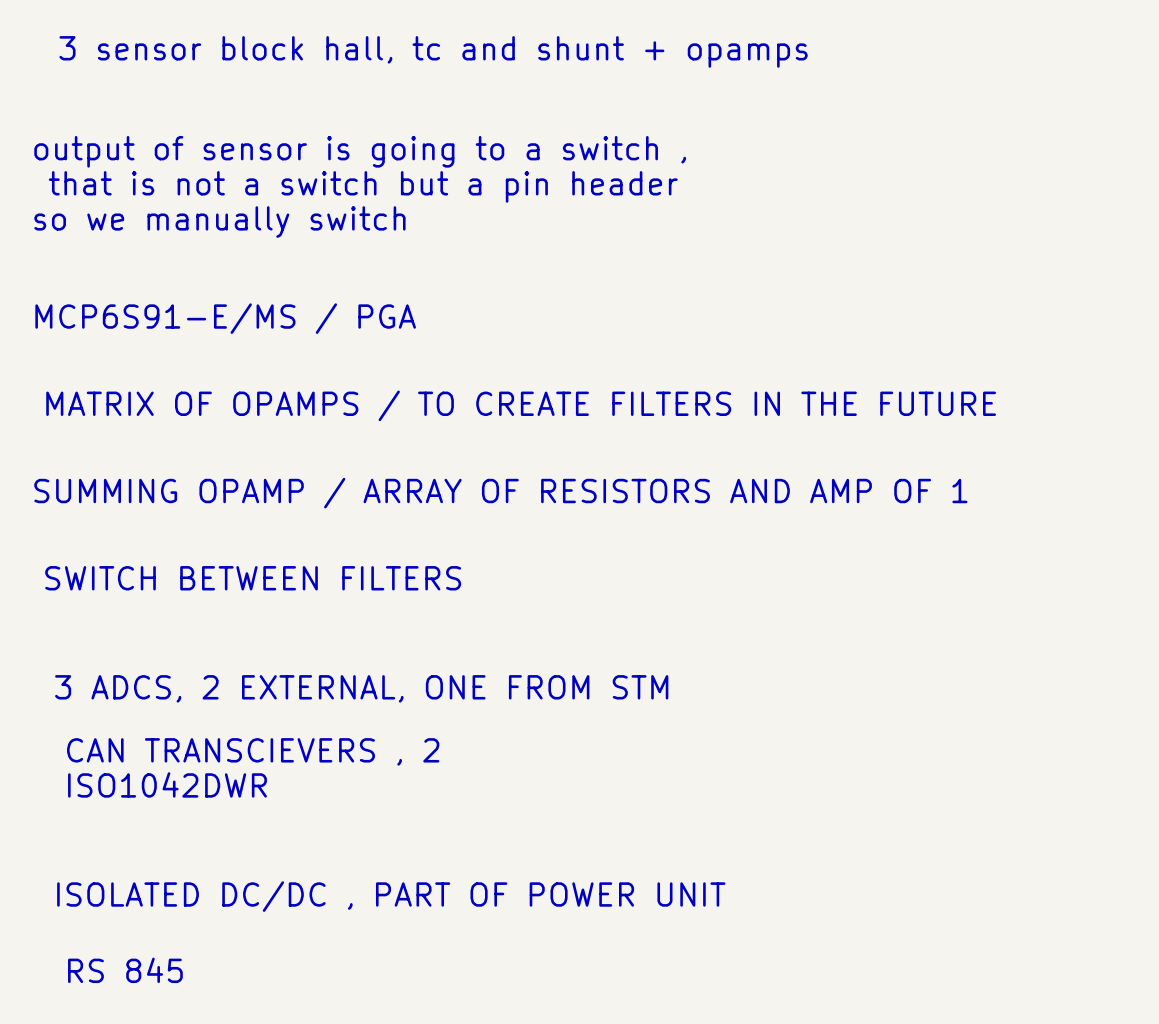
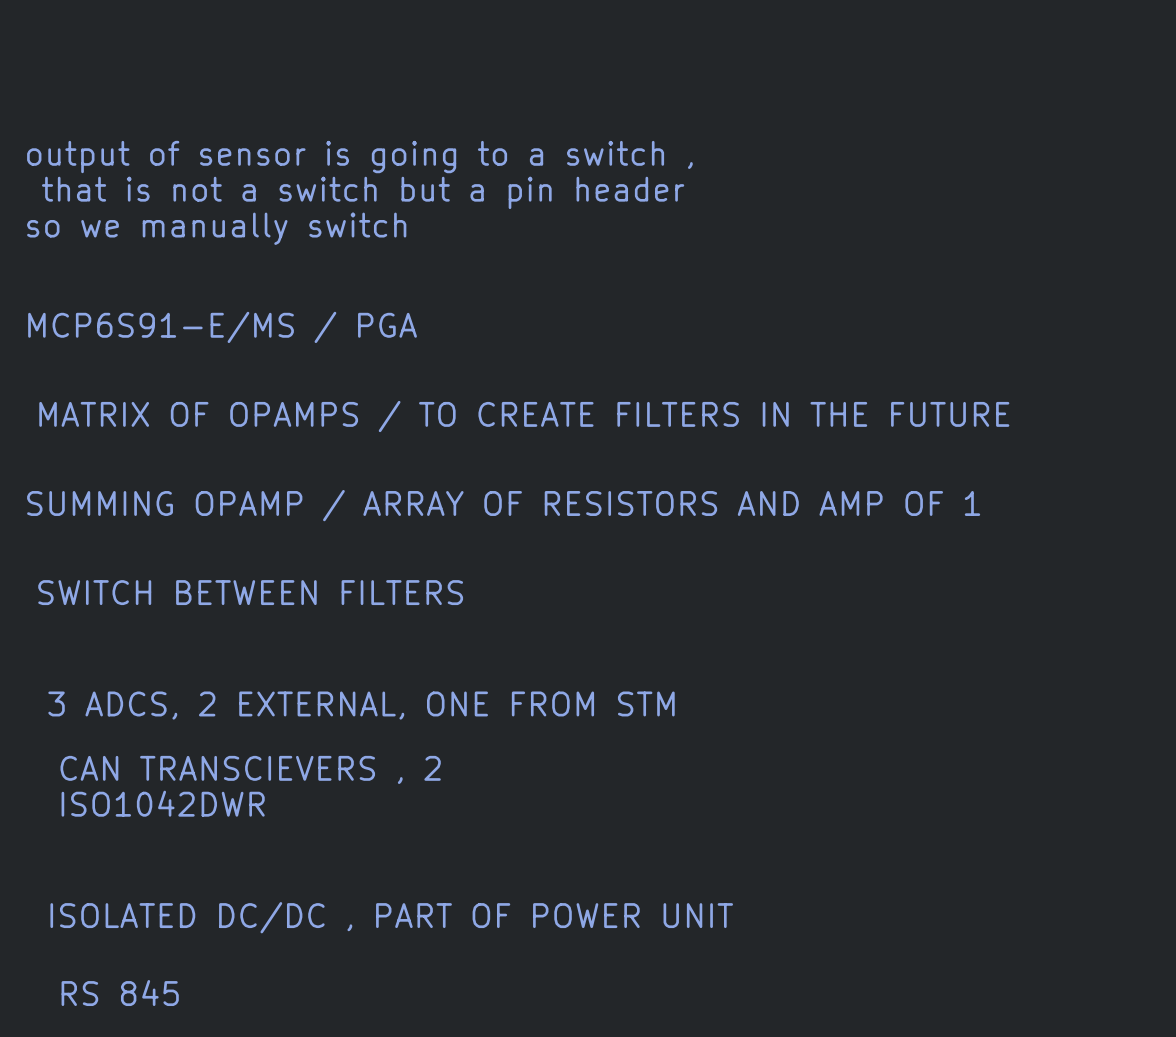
text: 3 sensor block hall, tc and shunt + opamps (433, 51) -> none

